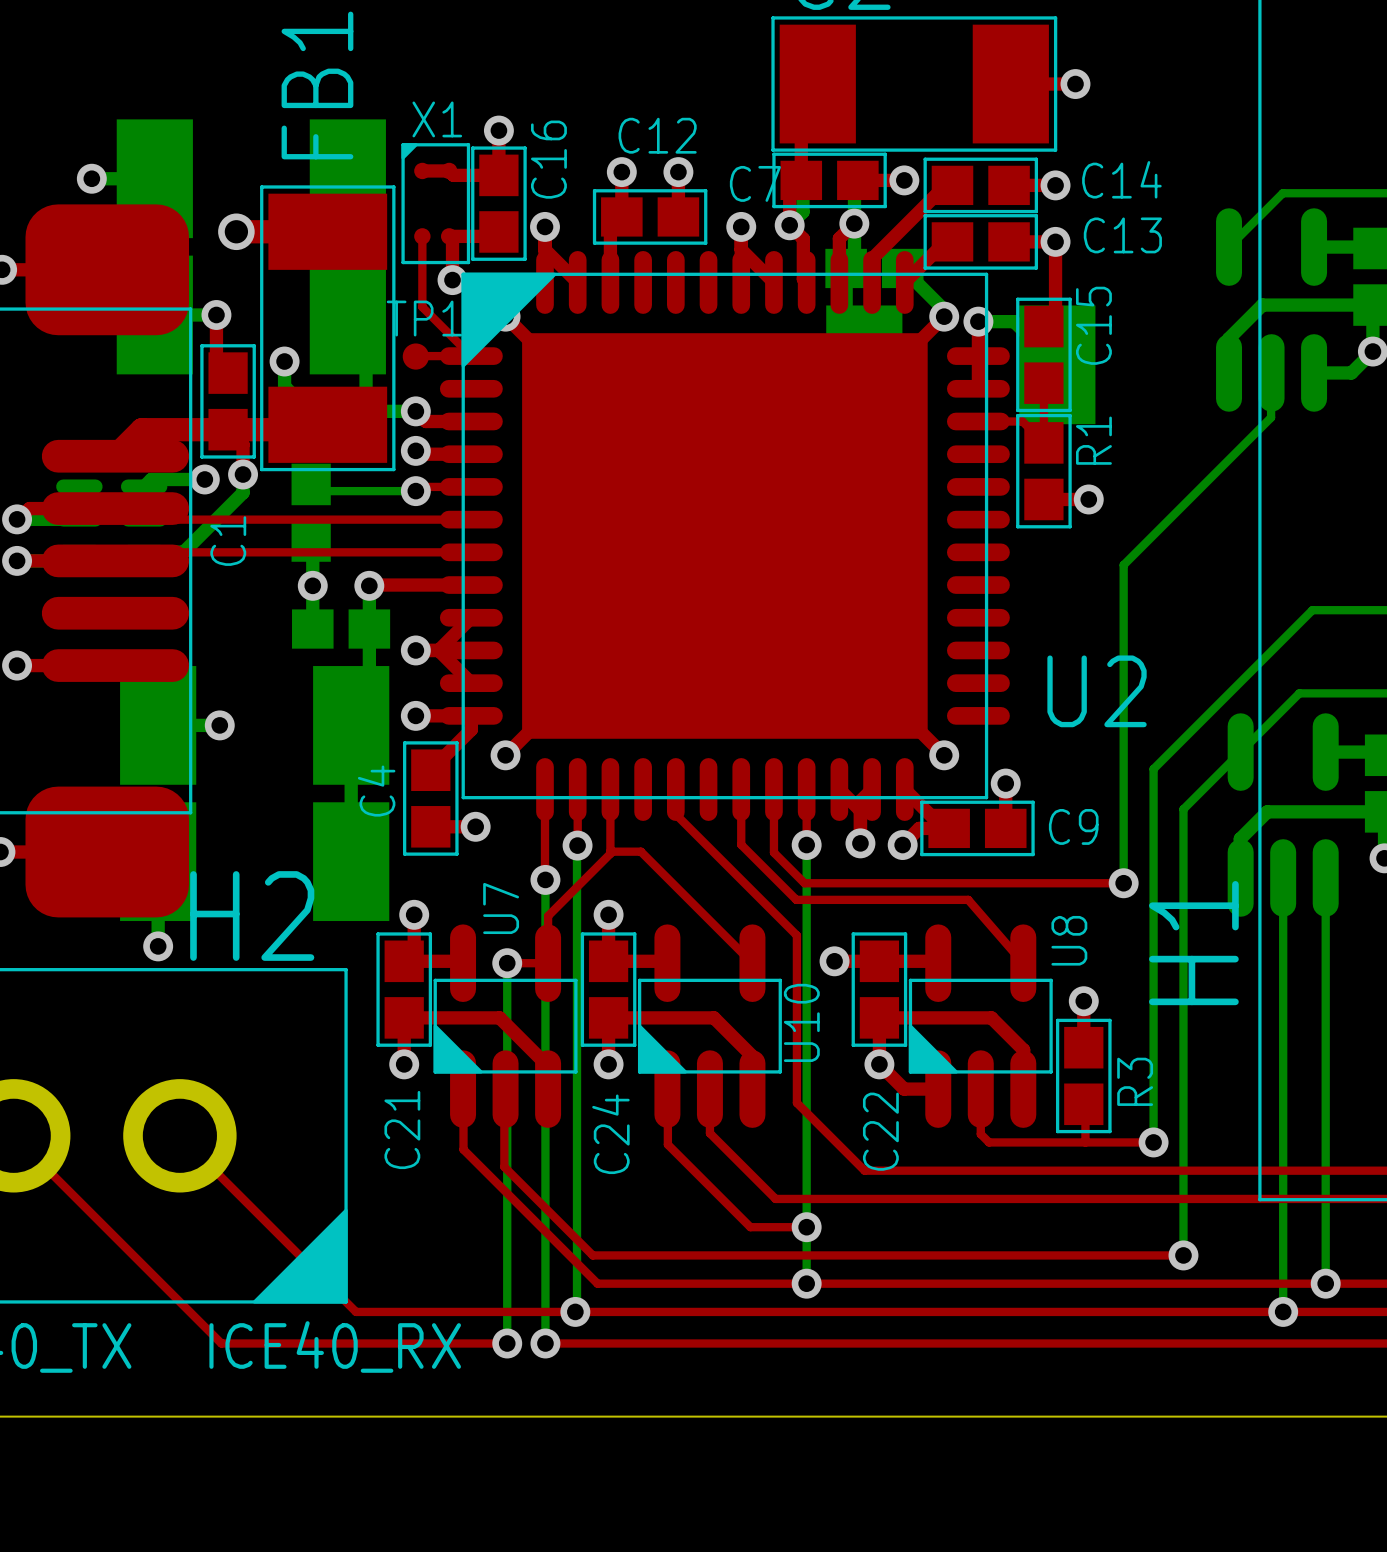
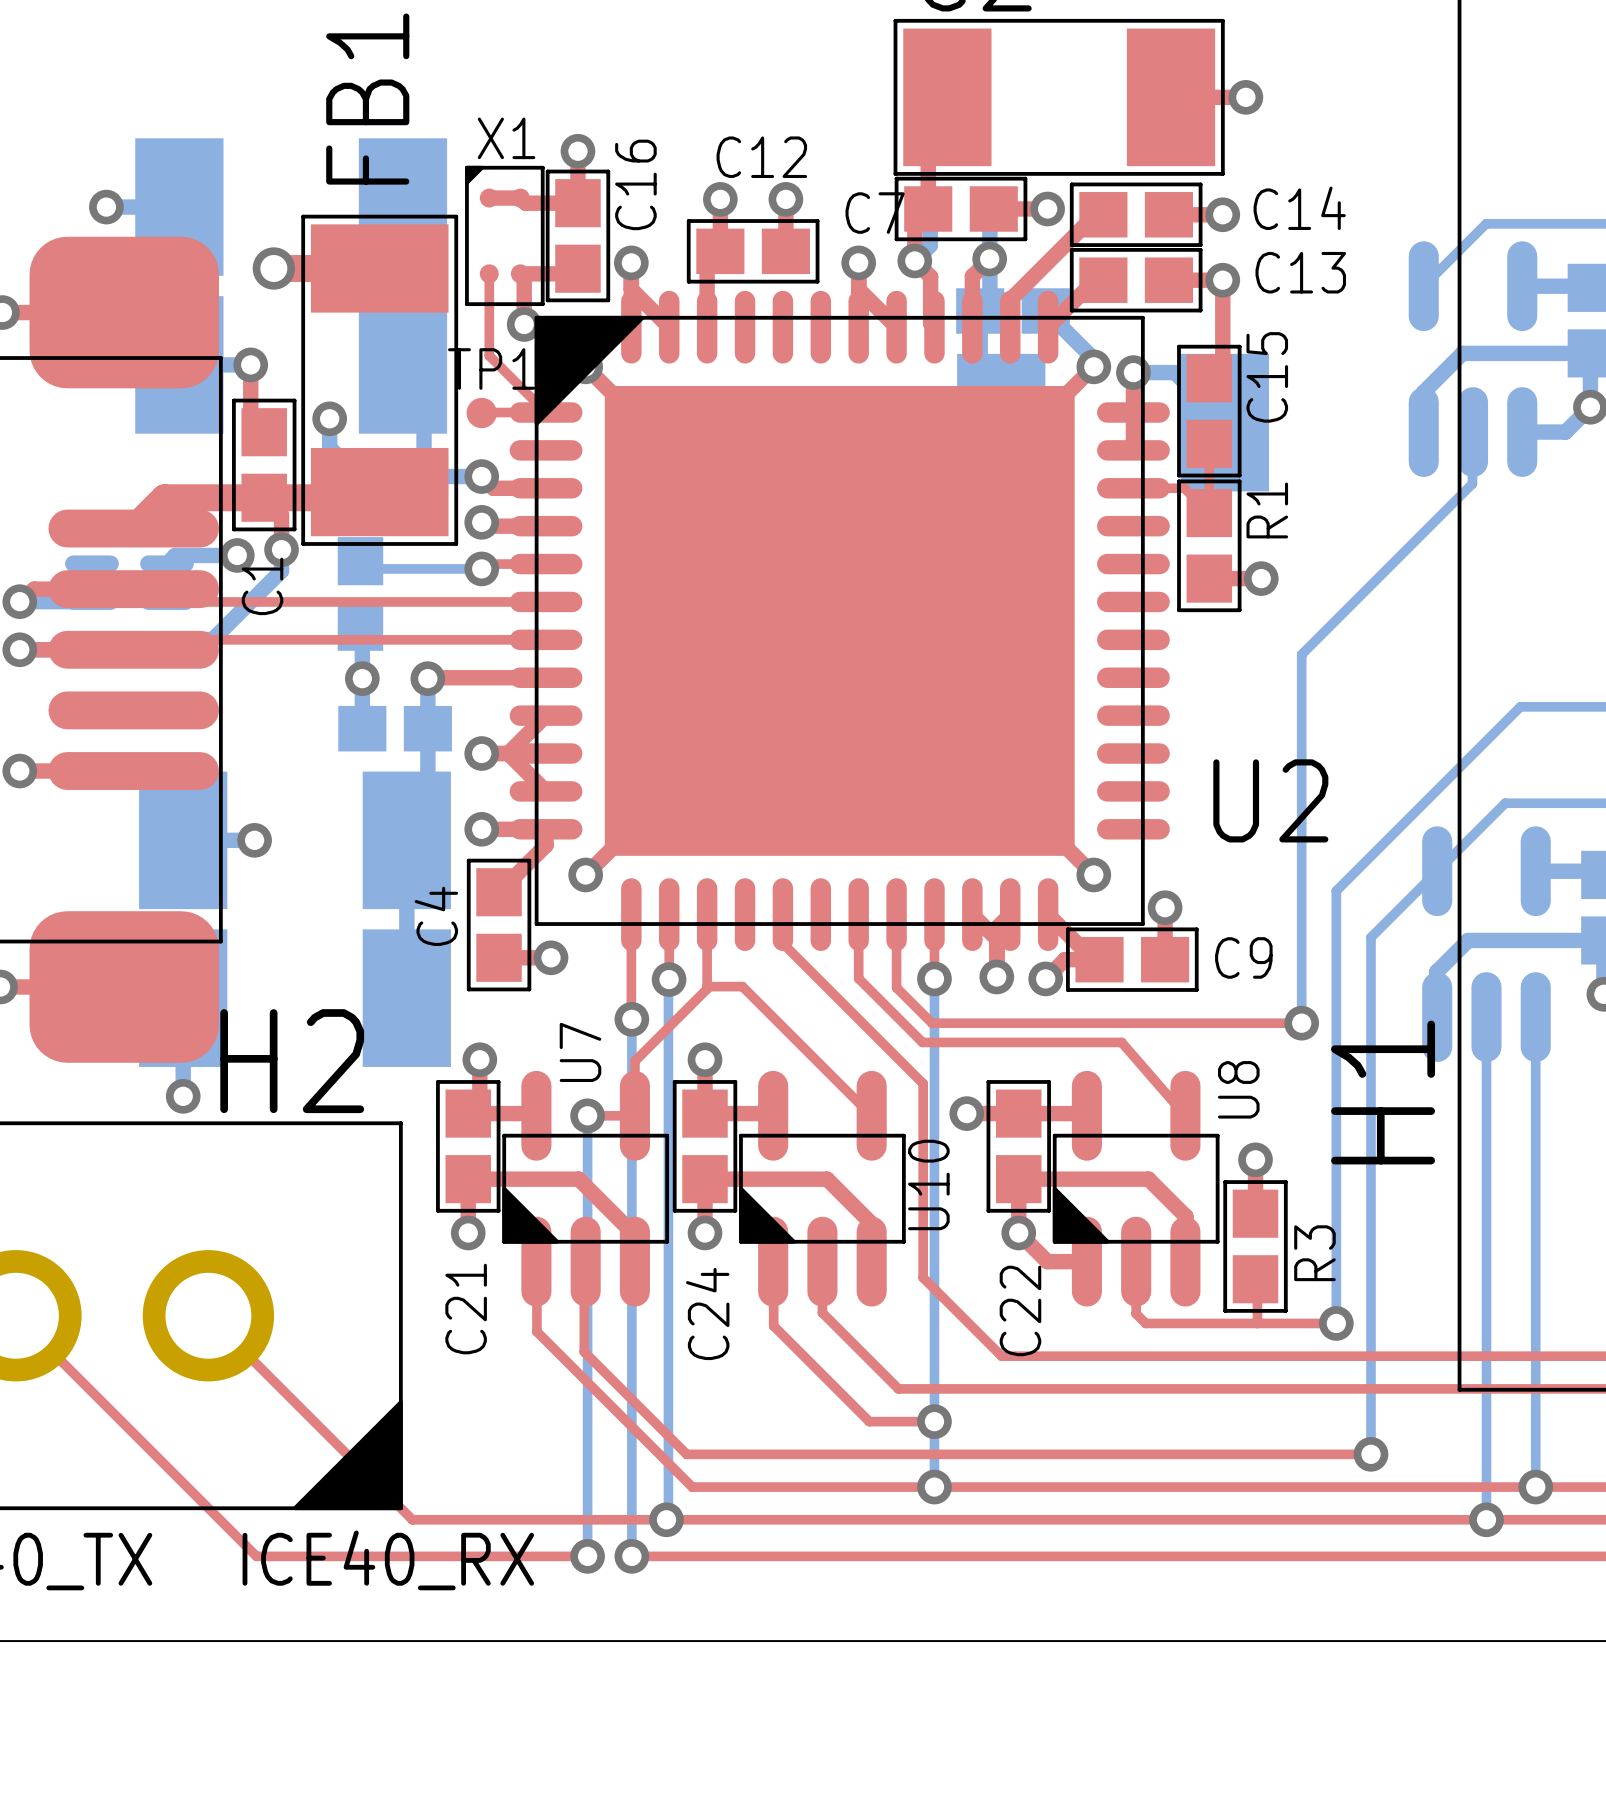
C1 name position: C1 (228, 541) -> C1 (262, 586)

